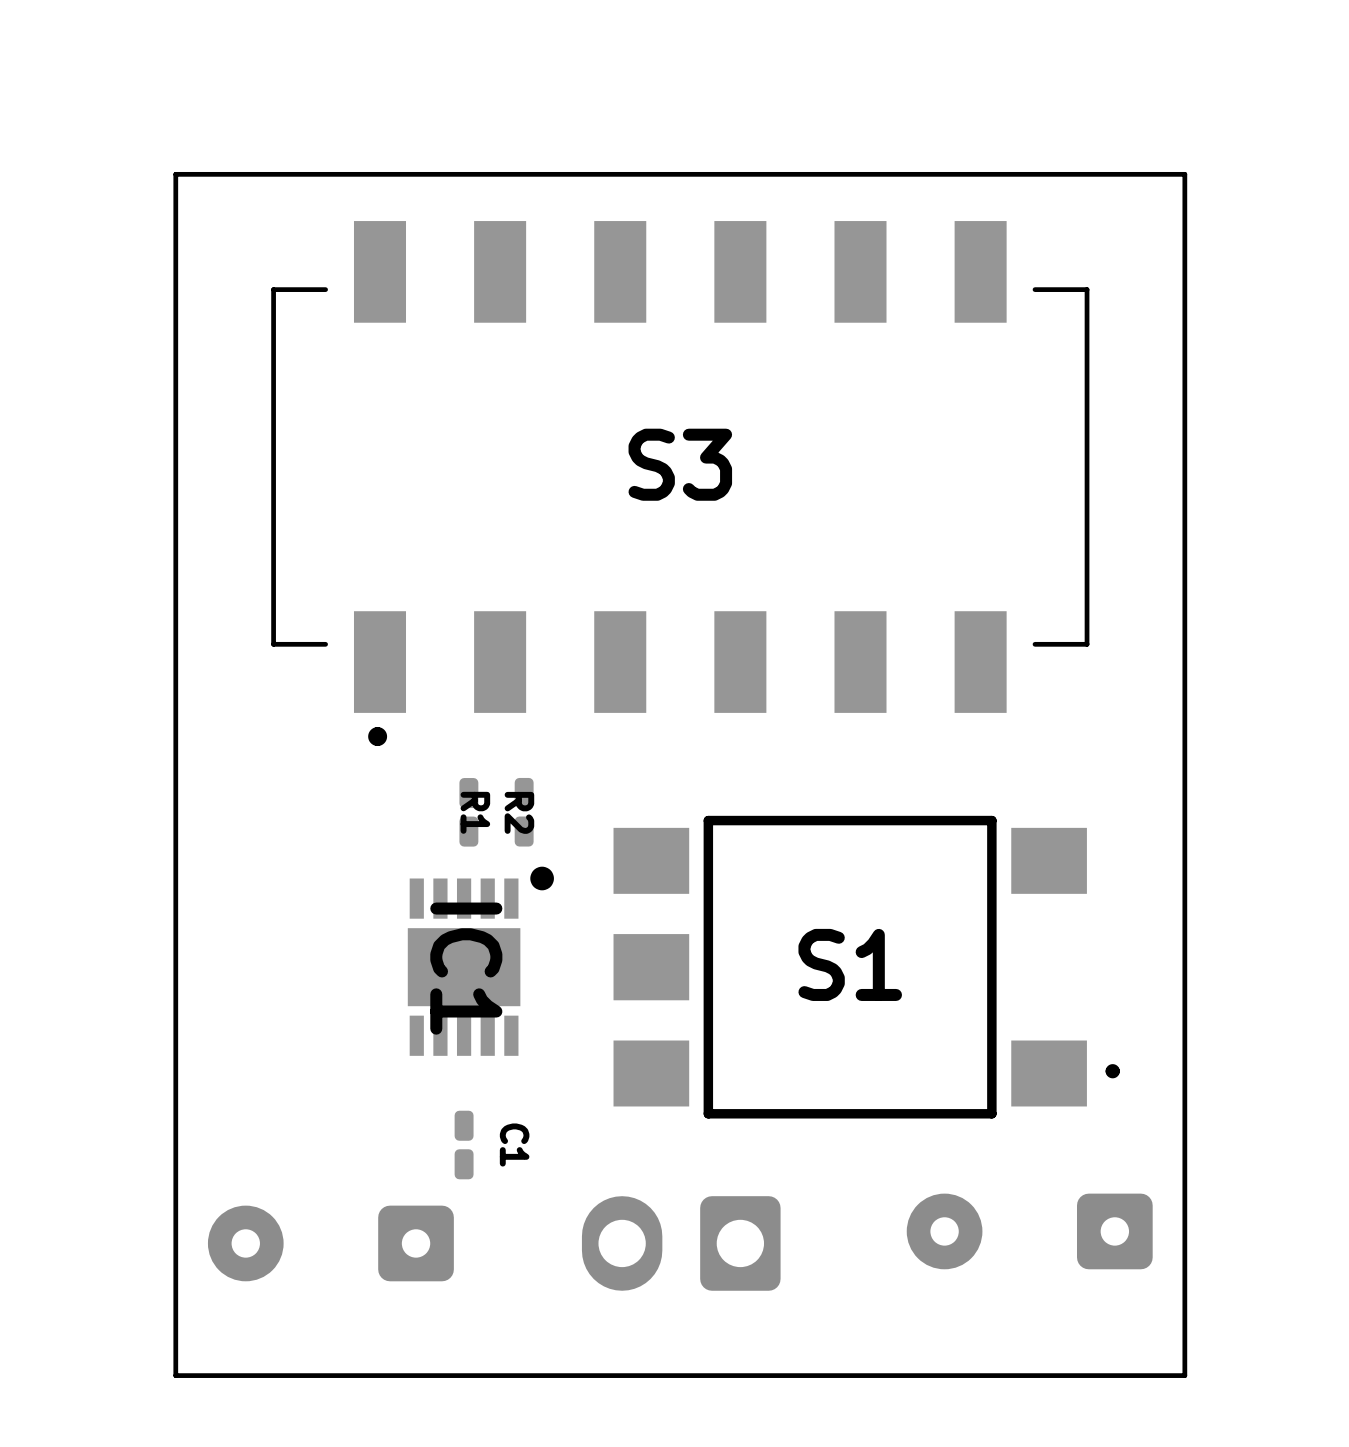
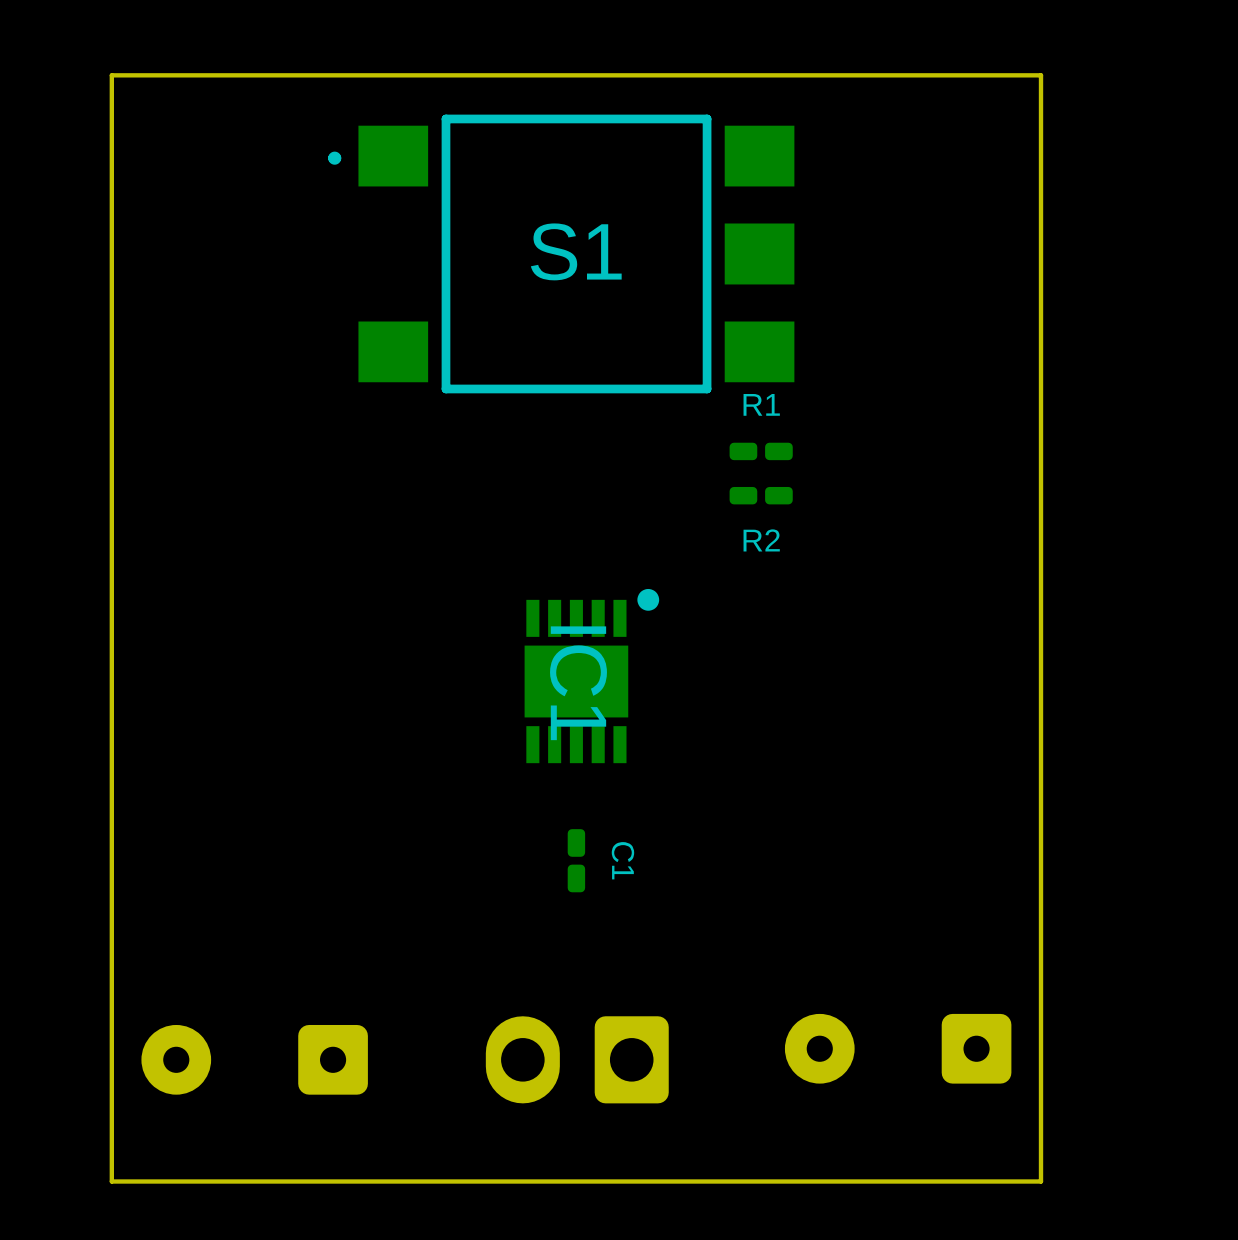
S3: (680, 483) -> none
R2 rotation: 0° (468, 812) -> 90° clockwise (761, 495)
R2 position: (468, 812) -> (761, 495)
R1 rotation: 0° (524, 812) -> 90° clockwise (761, 451)
R1 position: (524, 812) -> (761, 451)
IC1 position: (480, 961) -> (591, 676)
S1 rotation: 0° (866, 967) -> 180° (561, 253)
S1 position: (866, 967) -> (561, 253)
C1 position: (464, 1145) -> (576, 860)

